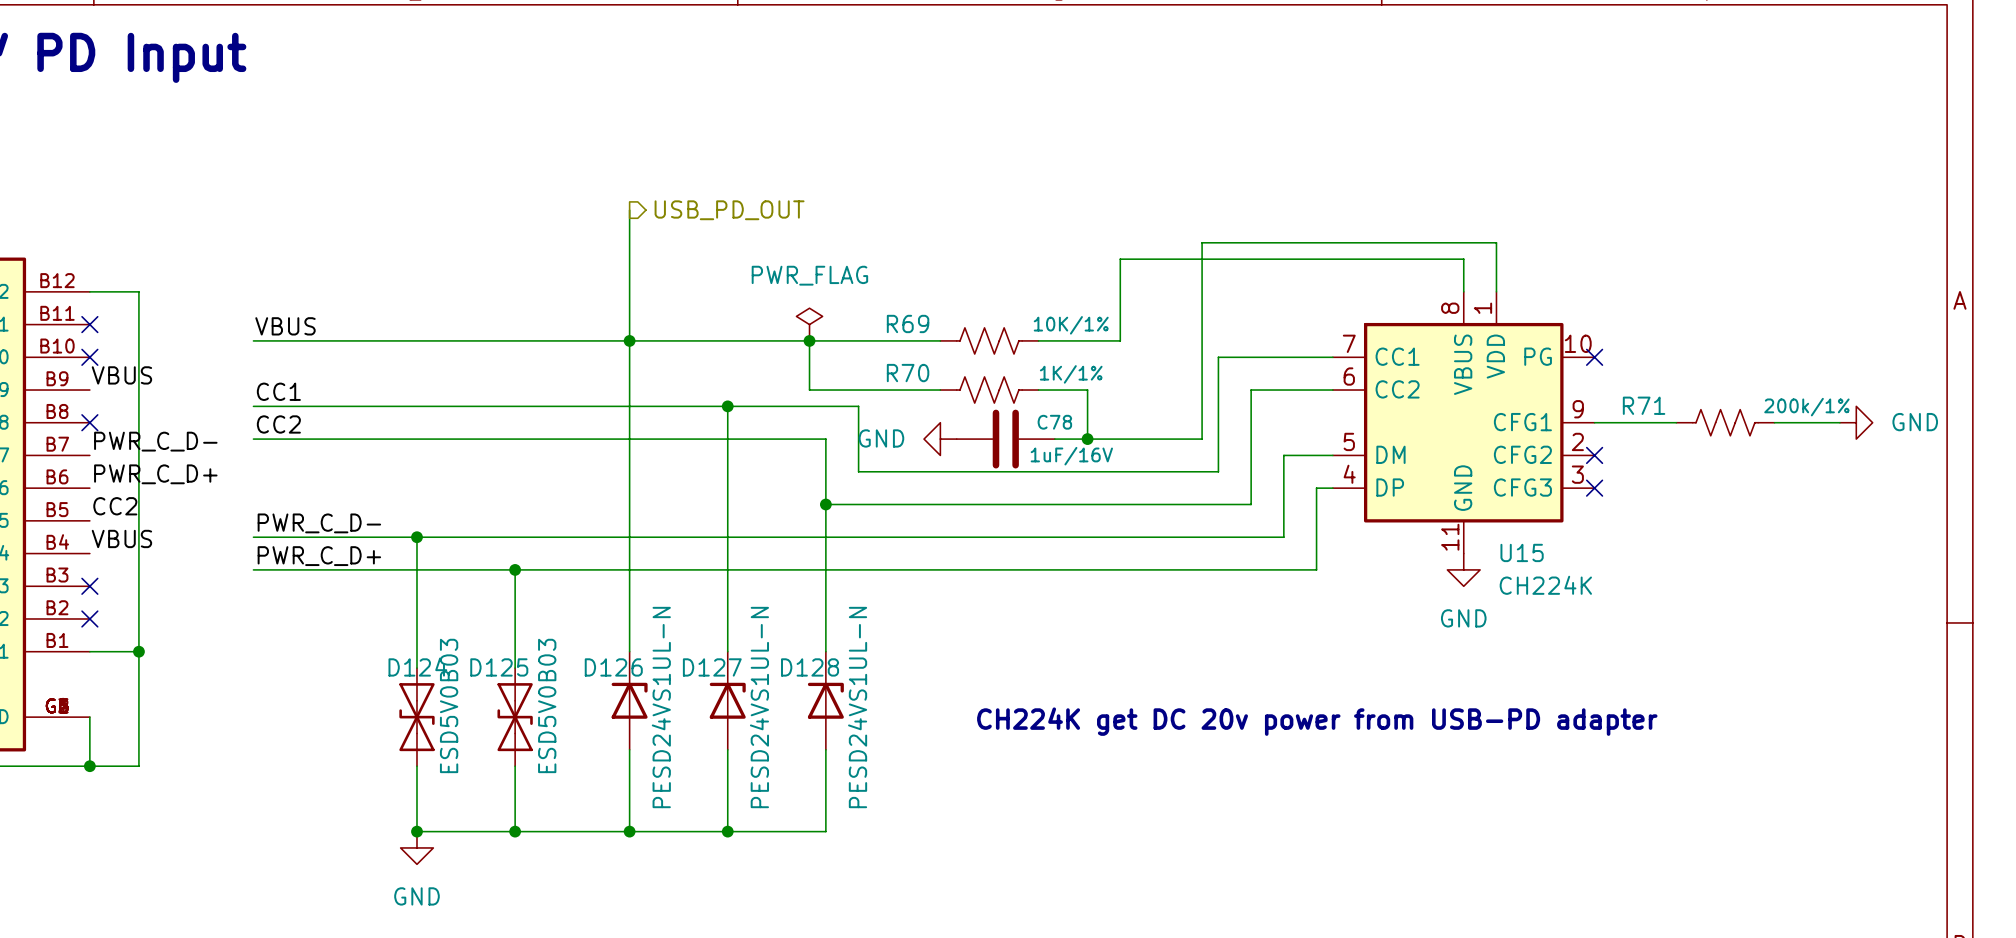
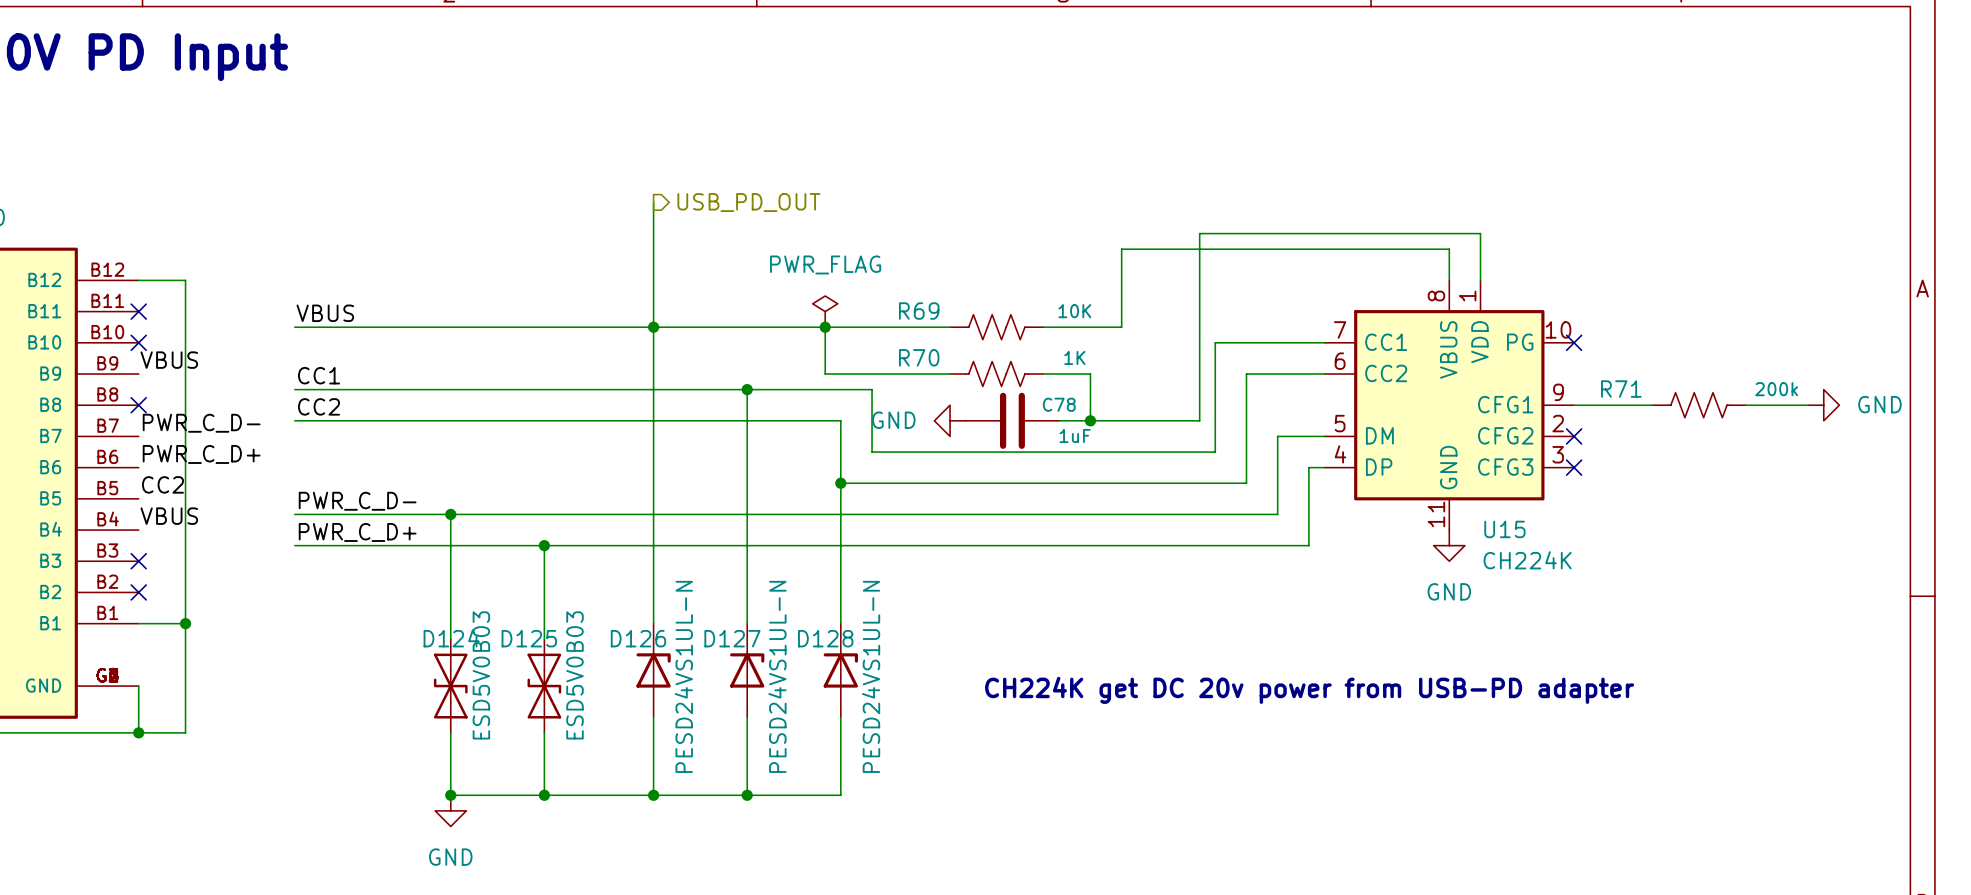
R69 value: 10K/1% (1071, 325) -> 10K (1074, 311)
R70 value: 1K/1% (1071, 374) -> 1K (1074, 357)
R71 value: 200k/1% (1806, 407) -> 200k (1776, 389)
C78 value: 1uF/16V (1071, 456) -> 1uF (1075, 435)

